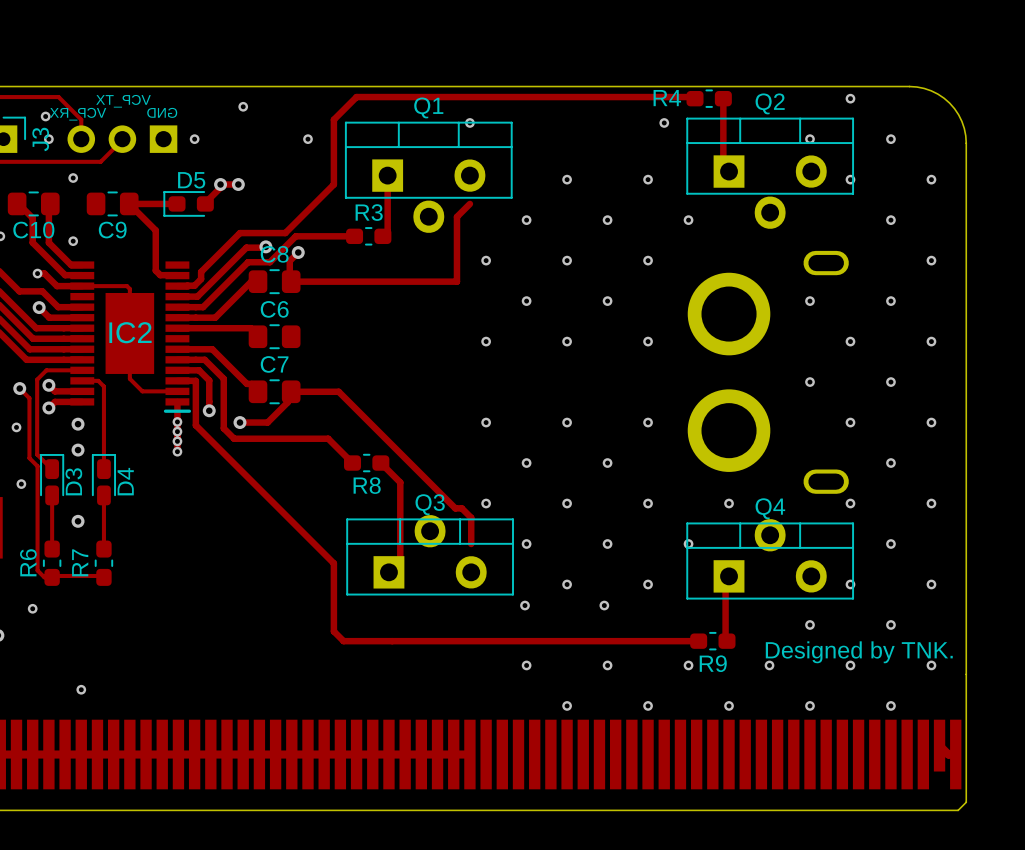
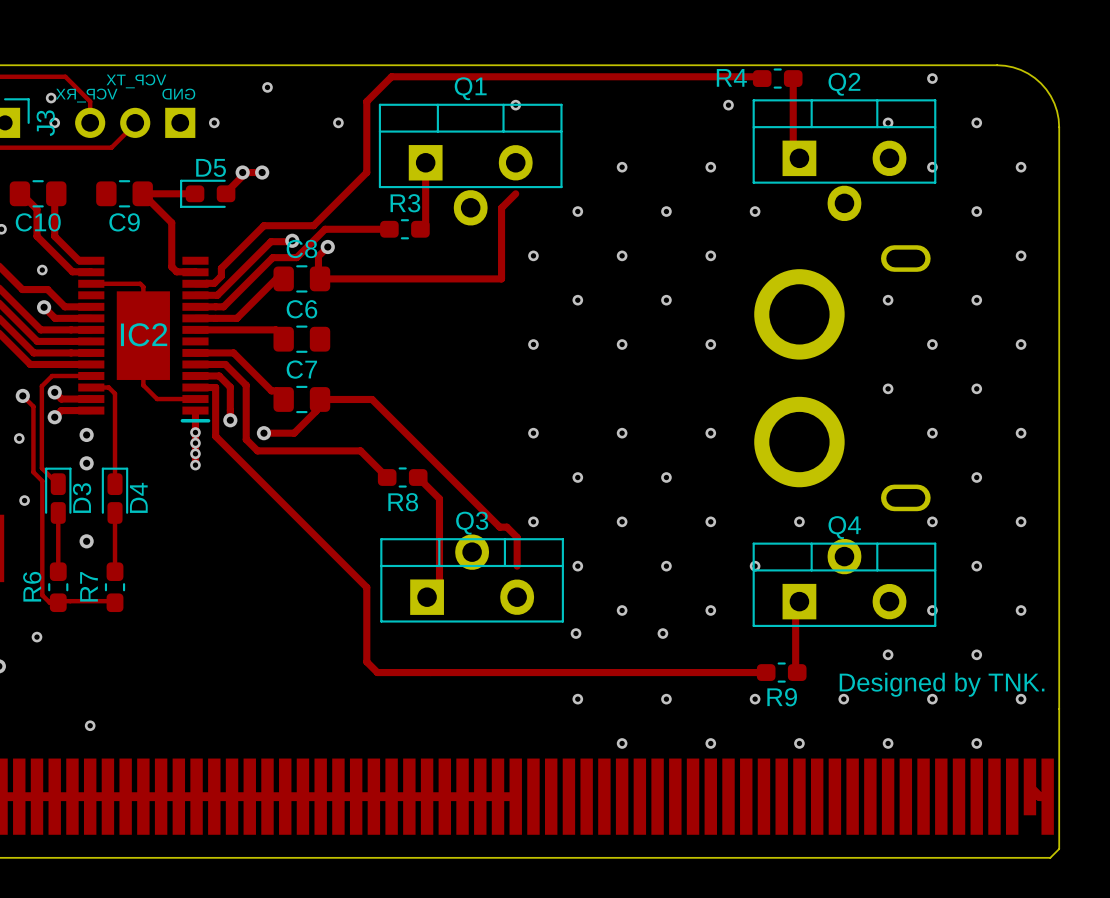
via: (73, 178) -> none
via: (73, 241) -> none
track: (37, 273) (44, 273) (56, 286) (82, 286) -> none

